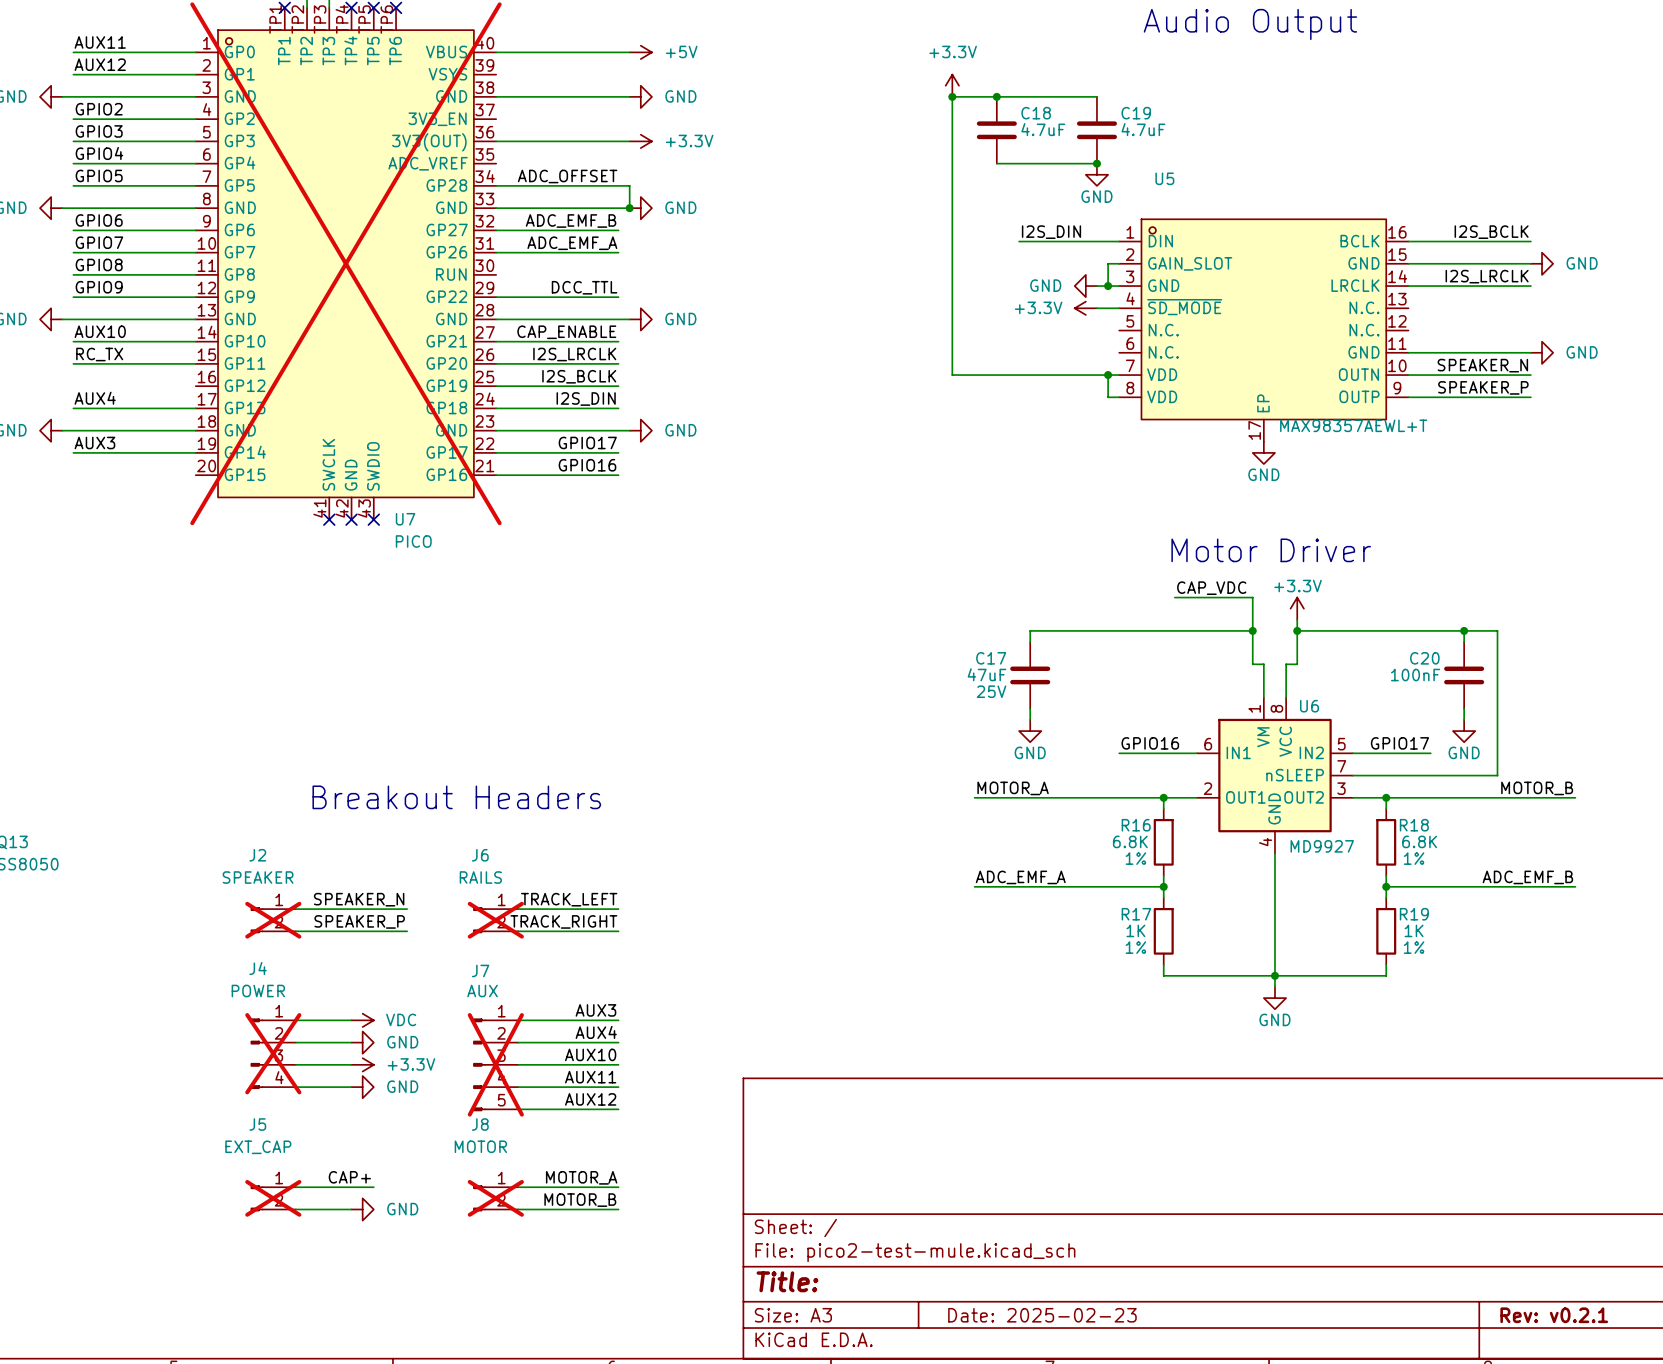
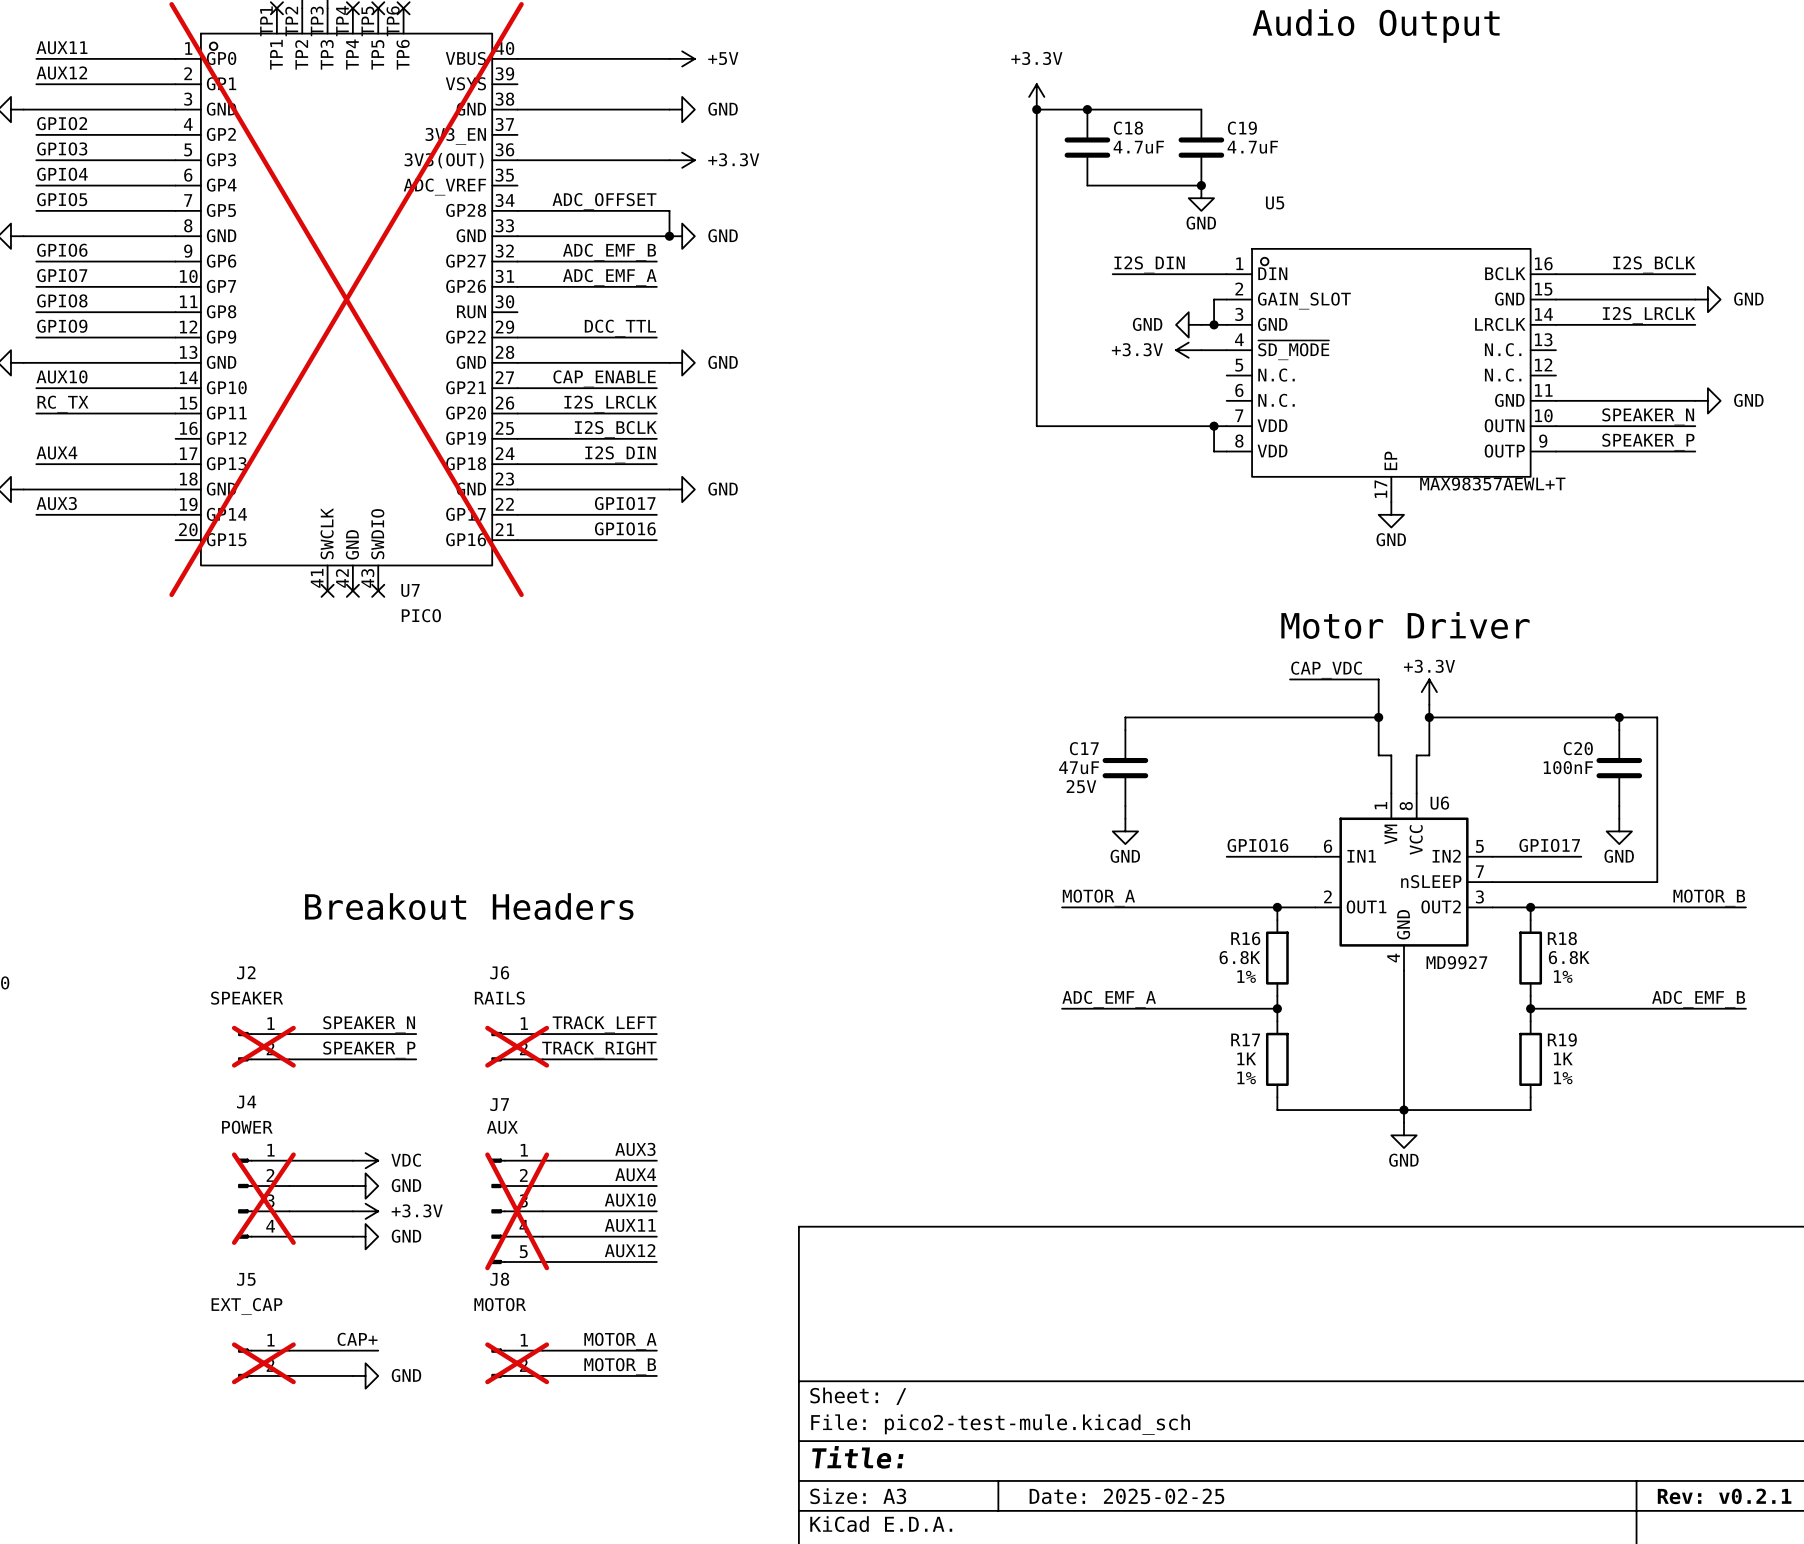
title block: Date: 2025-02-23 (1042, 1315) -> Date: 2025-02-25 (1126, 1496)

